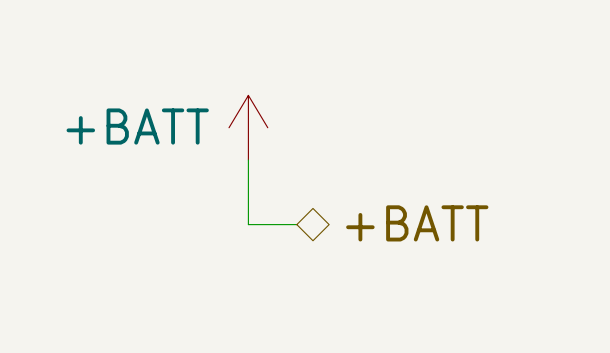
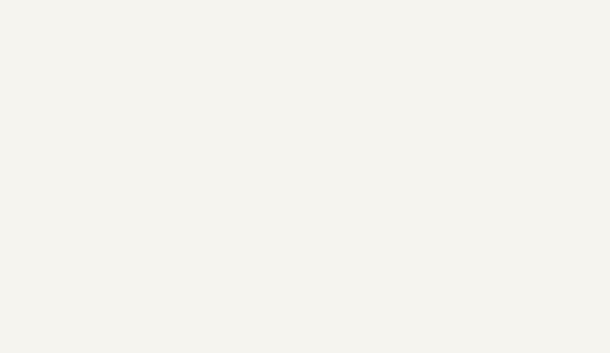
power symbol: +BATT (248, 127) -> none
wire: (248, 160) (248, 224) (296, 224) -> none
hierarchical label: +BATT (417, 223) -> none

